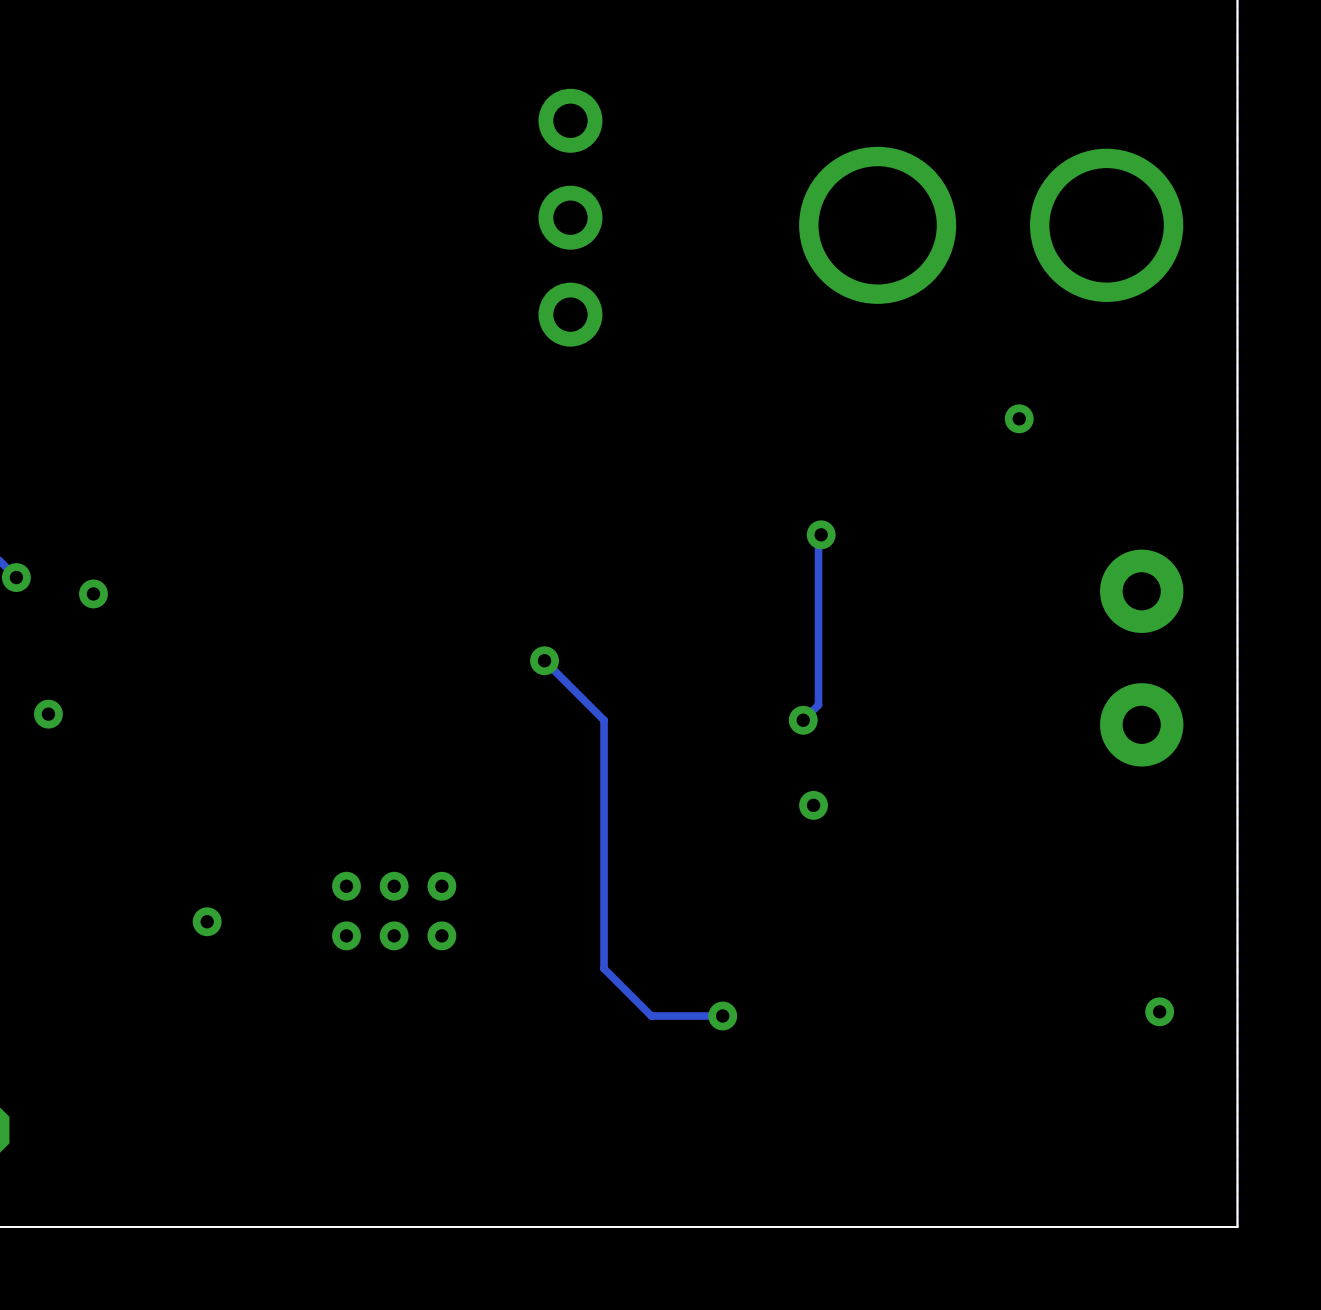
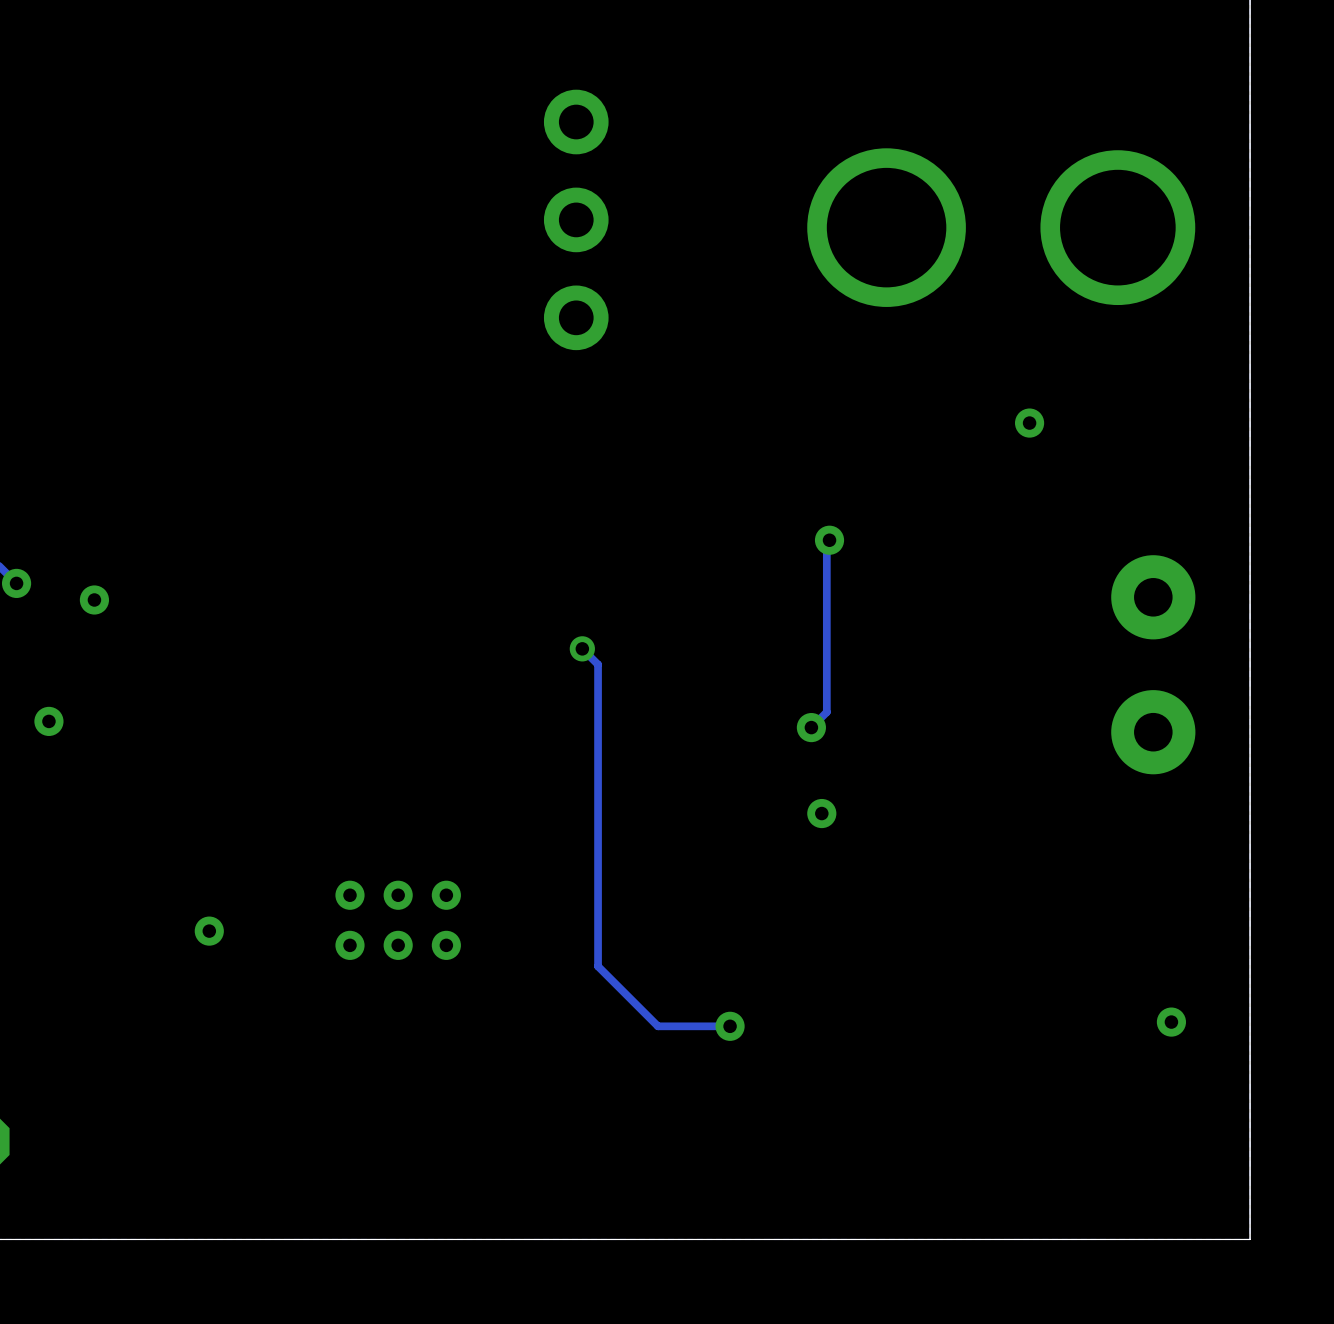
via: none -> (582, 648)
track: (544, 660) (604, 720) (604, 968) -> (582, 648) (598, 664) (598, 966) (610, 978)
via: (544, 660) -> none

